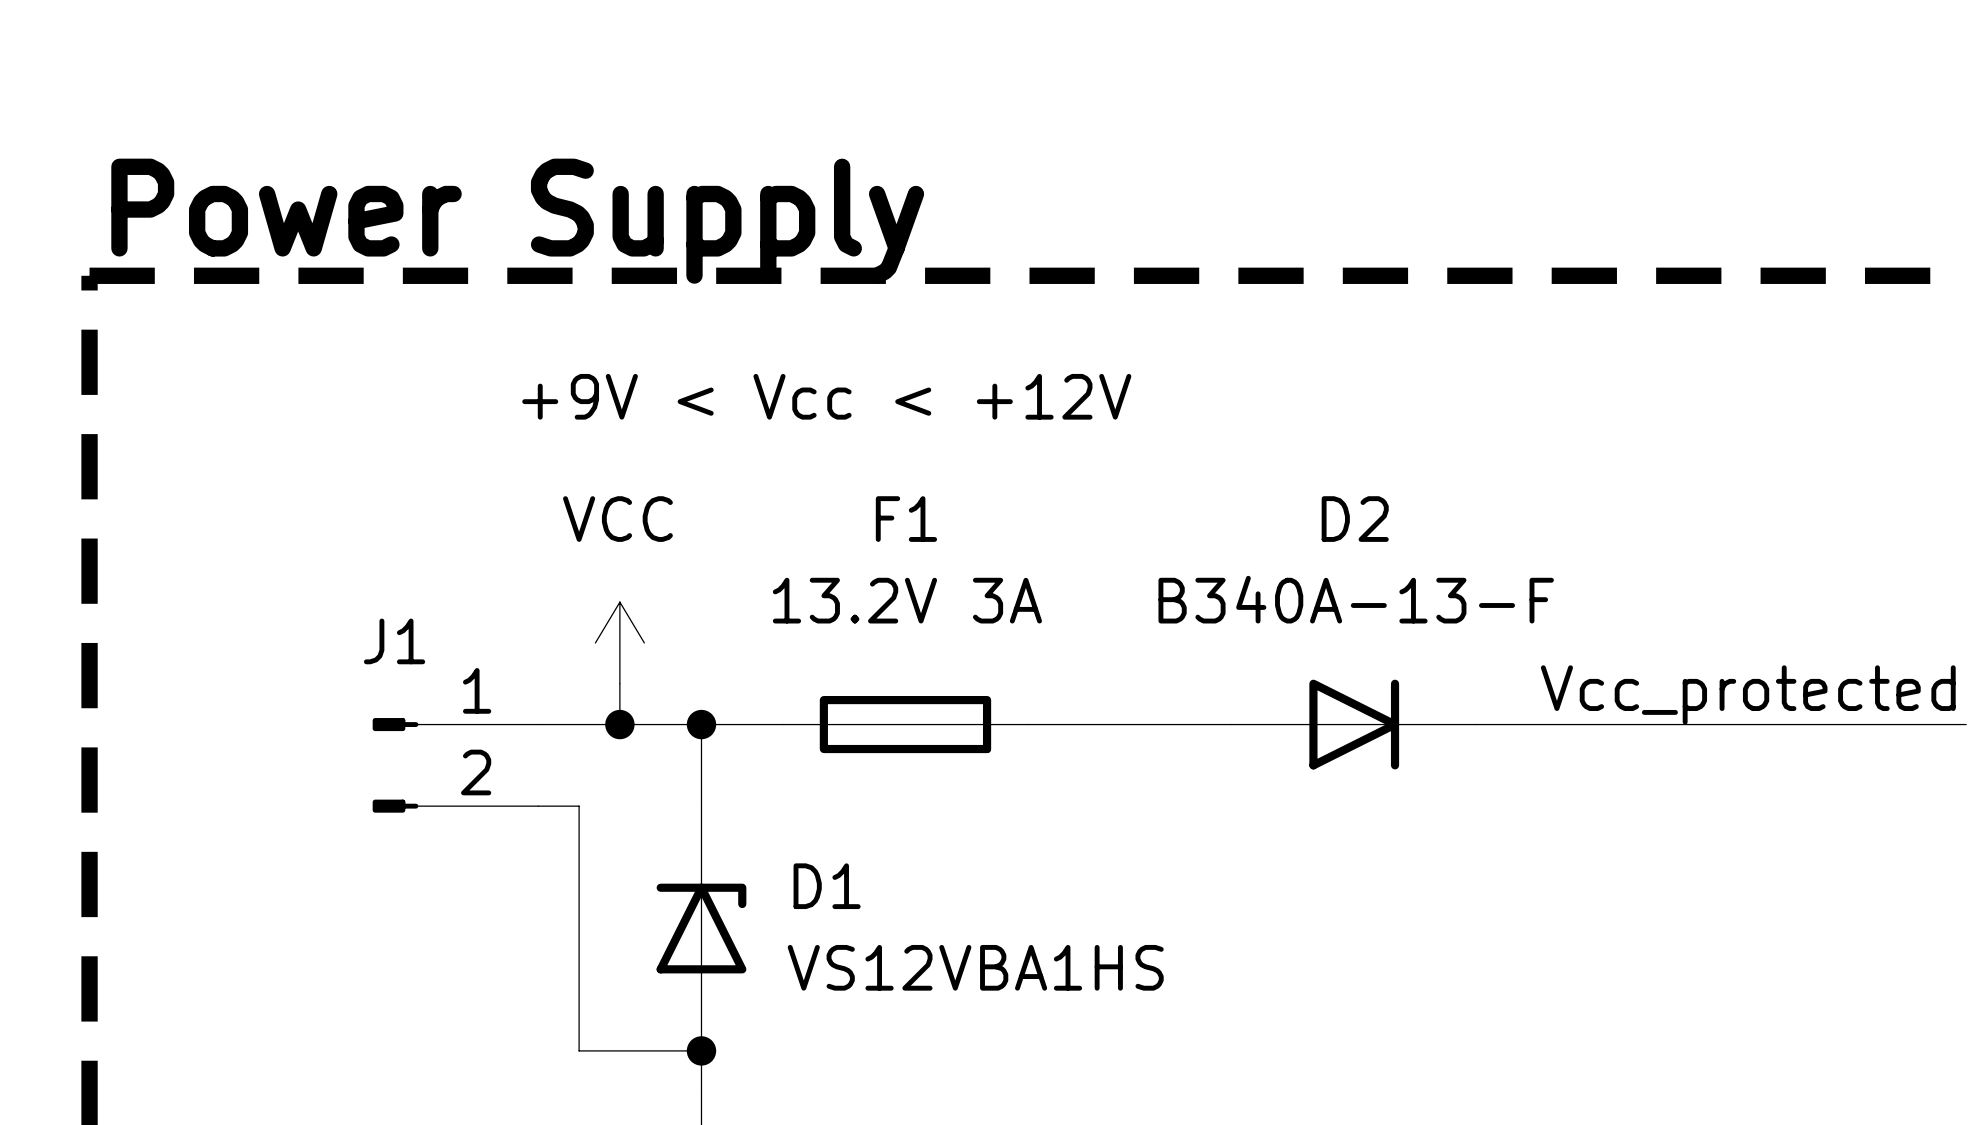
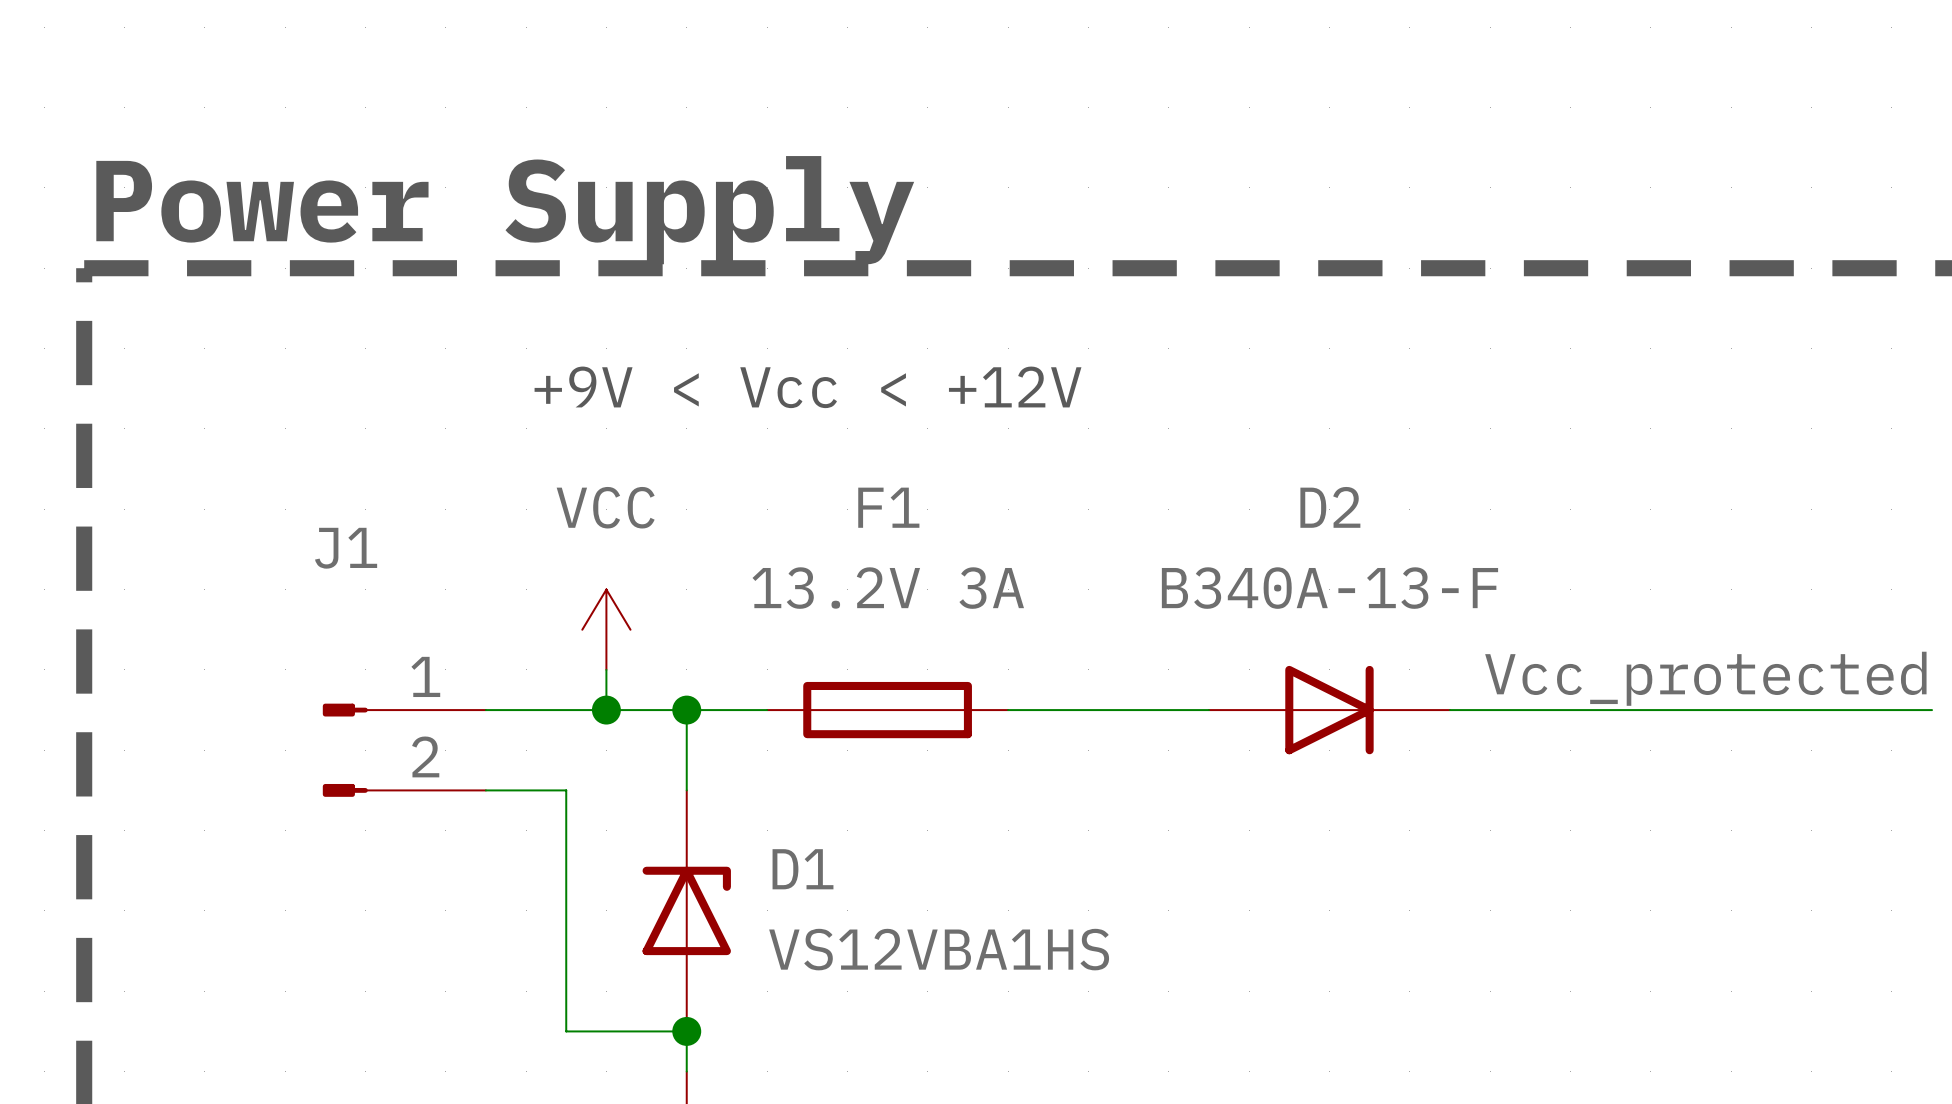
J1 name position: J1 (394, 641) -> J1 (346, 548)
J1 position: (455, 765) -> (404, 750)

